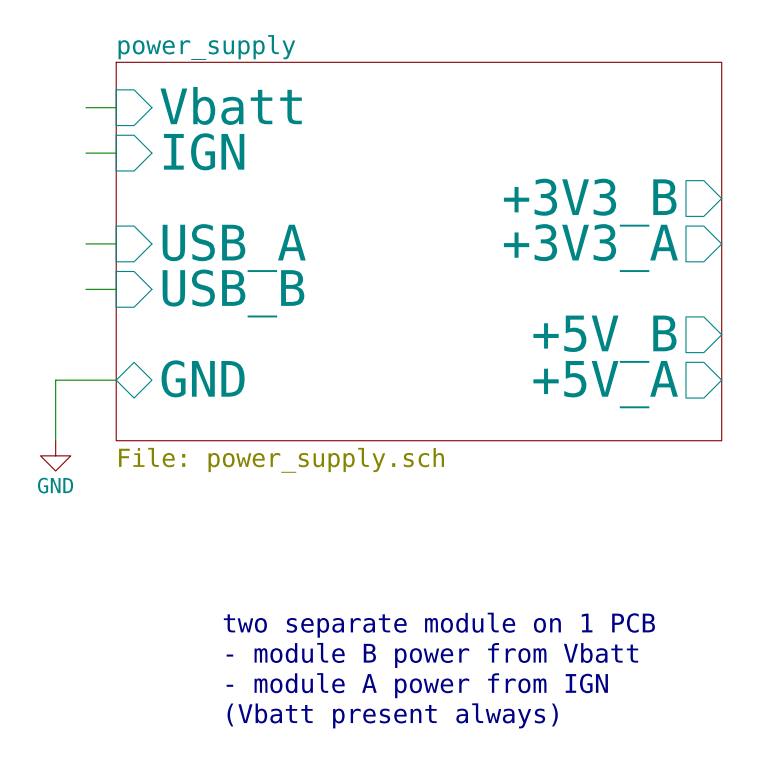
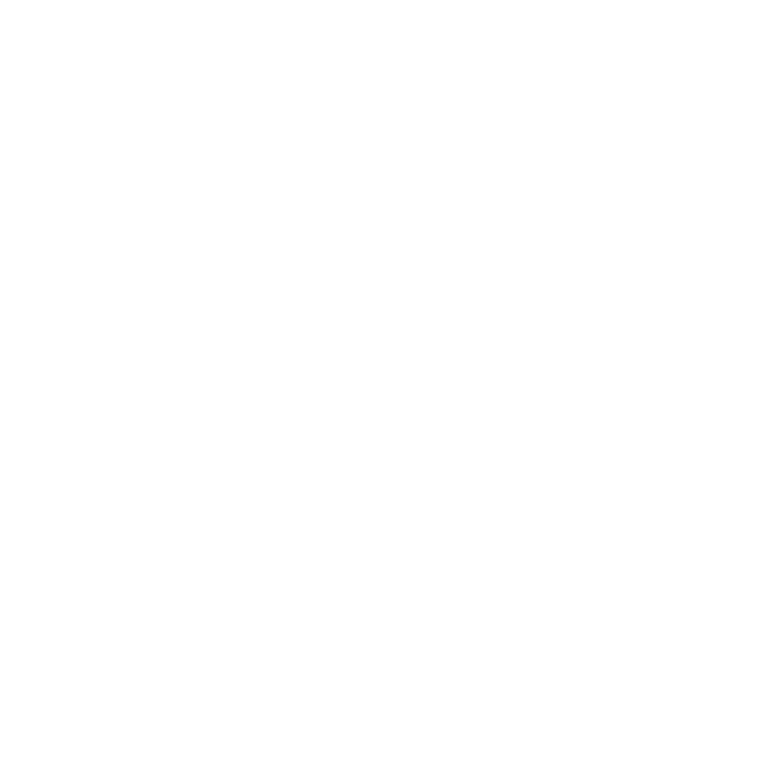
sheet pin: Vbatt (231, 105) -> none
wire: (85, 107) (116, 107) -> none
sheet pin: IGN (204, 151) -> none
wire: (85, 153) (116, 153) -> none
sheet pin: +3V3_B (590, 202) -> none
wire: (85, 243) (116, 243) -> none
sheet pin: USB_A (234, 248) -> none
sheet pin: +3V3_A (590, 248) -> none
sheet power_supply: File: power_supply.sch (418, 251) -> none
wire: (85, 289) (116, 289) -> none
sheet pin: USB_B (233, 293) -> none
sheet pin: +5V_B (604, 339) -> none
sheet pin: GND (203, 378) -> none
wire: (116, 380) (55, 380) (55, 440) -> none
sheet pin: +5V_A (605, 384) -> none
power symbol: GND (55, 455) -> none
text: two separate module on 1 PCB (439, 625) -> none
text: - module B power from Vbatt (432, 655) -> none
text: - module A power from IGN (417, 685) -> none
text: (Vbatt present always) (392, 715) -> none

